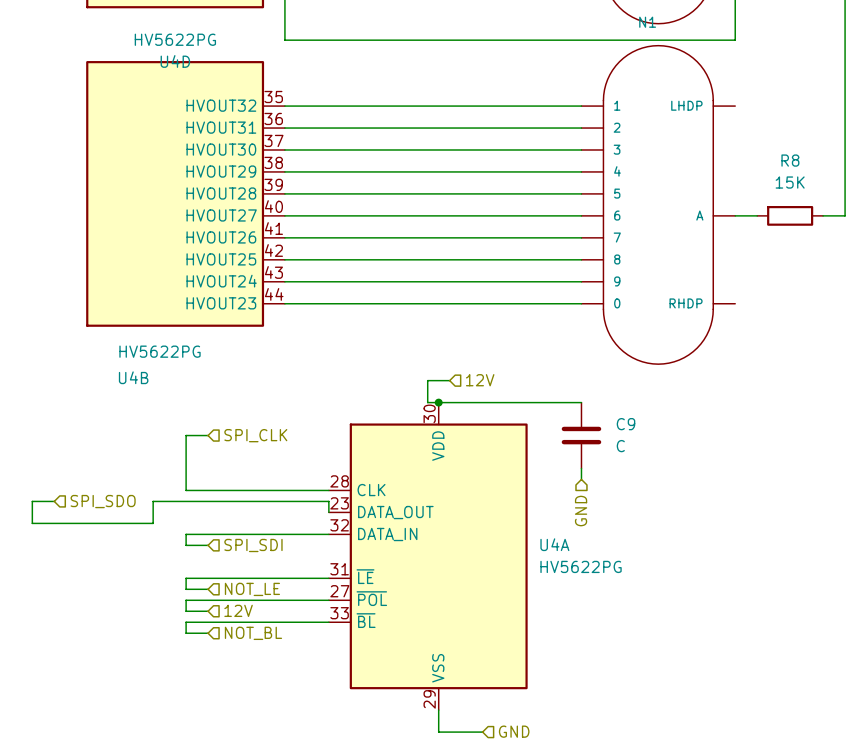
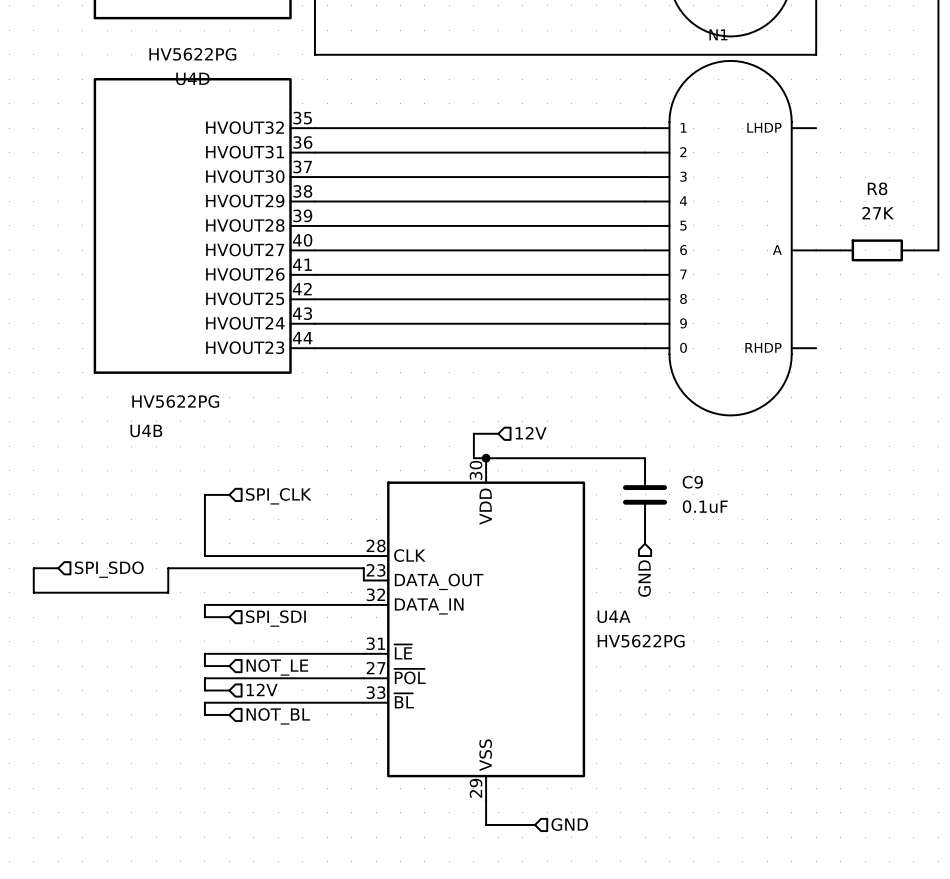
R8 value: 15K (790, 182) -> 27K (878, 213)
C9 value: C (620, 446) -> 0.1uF (705, 506)

